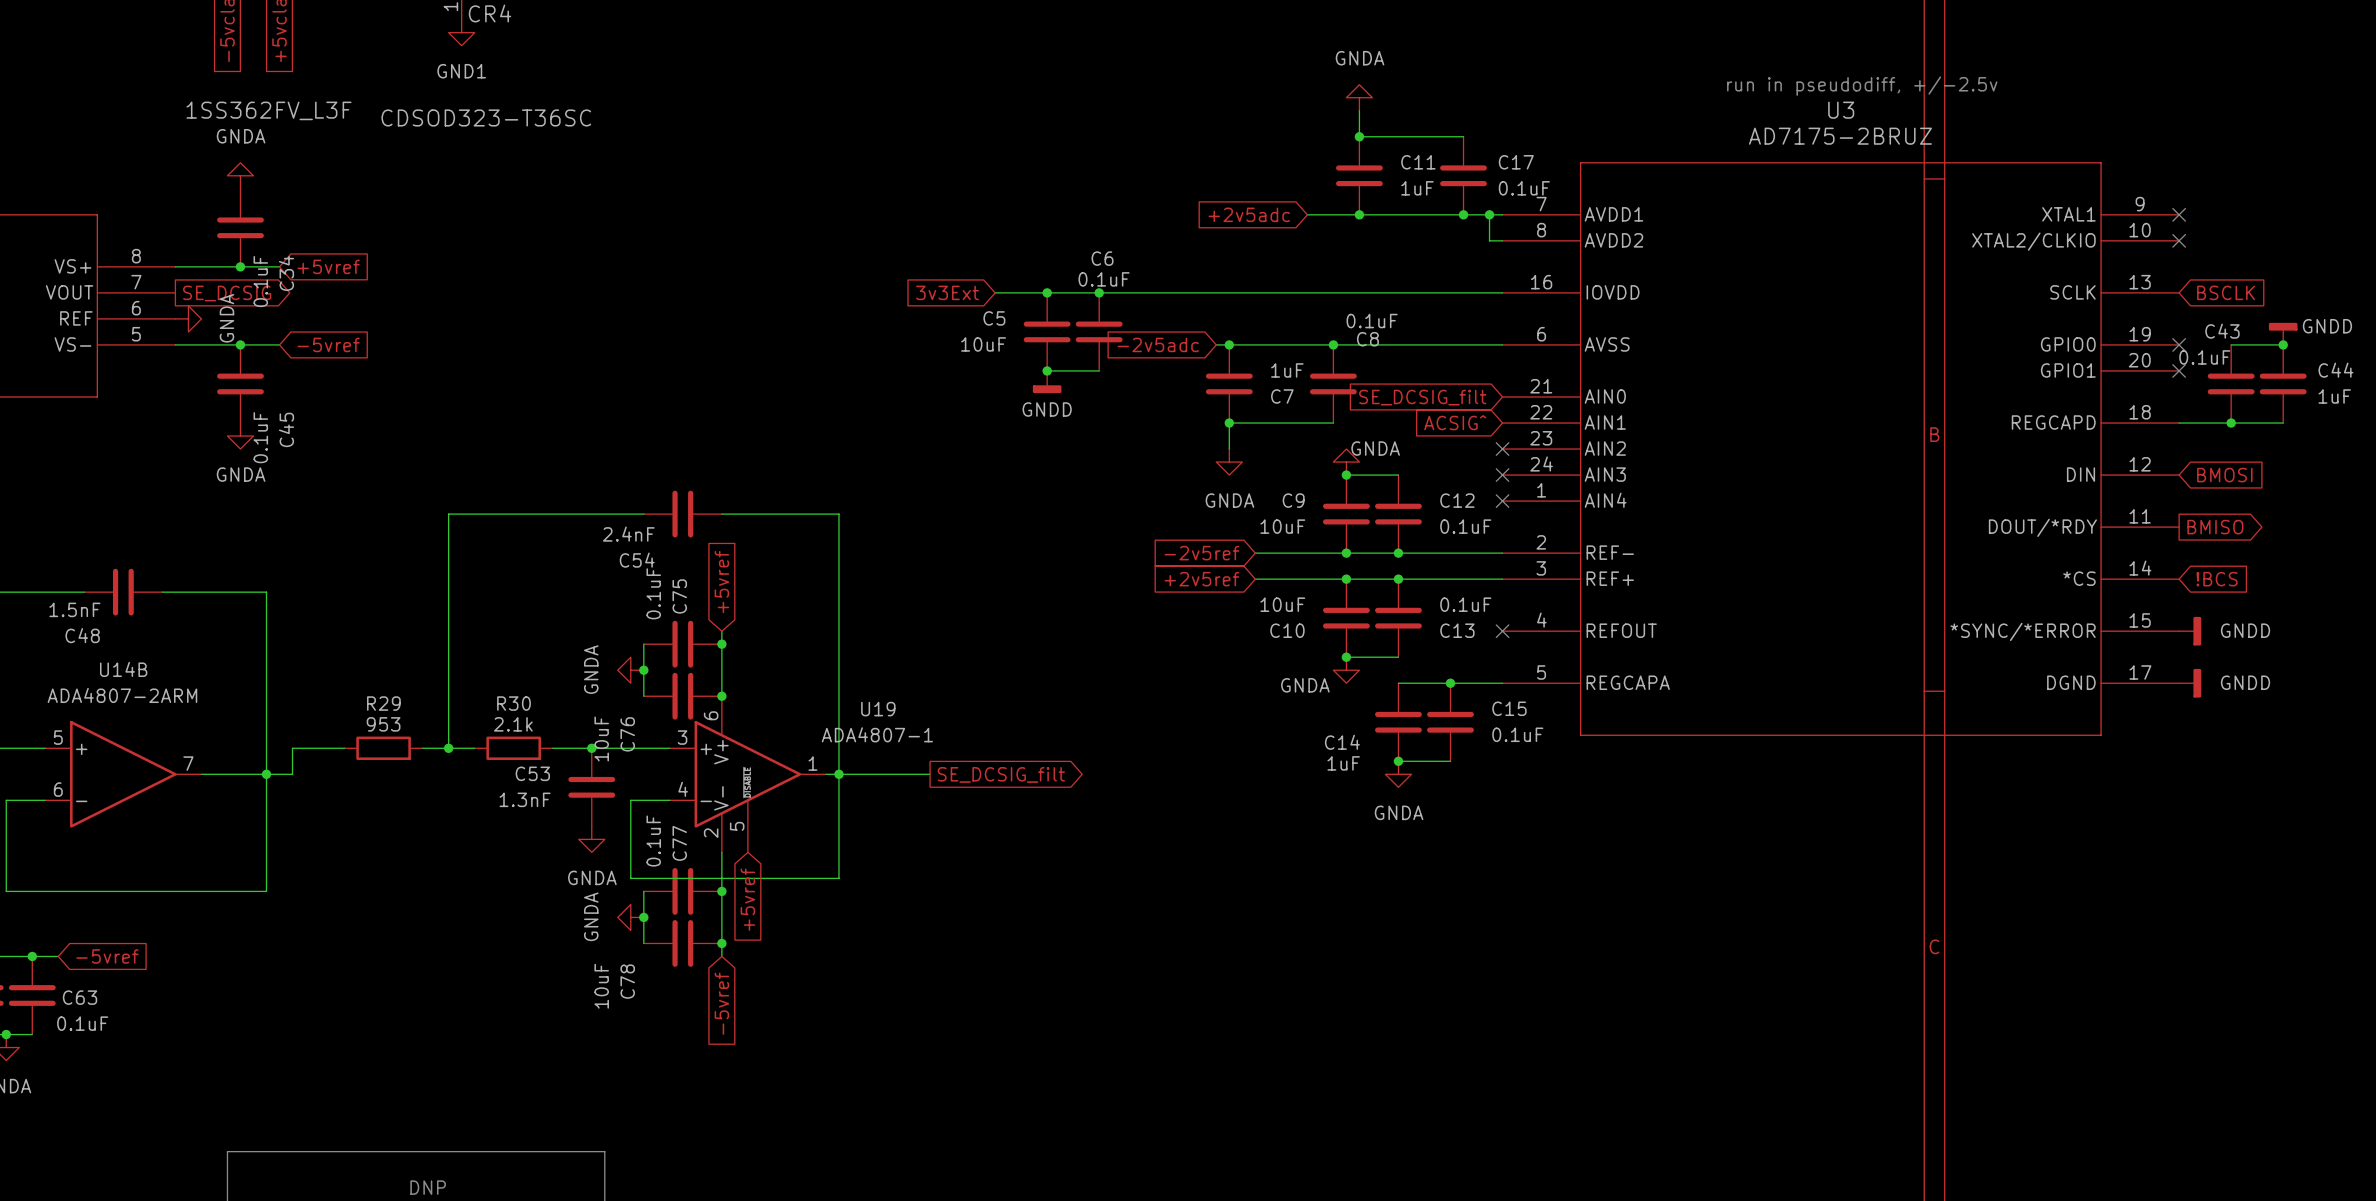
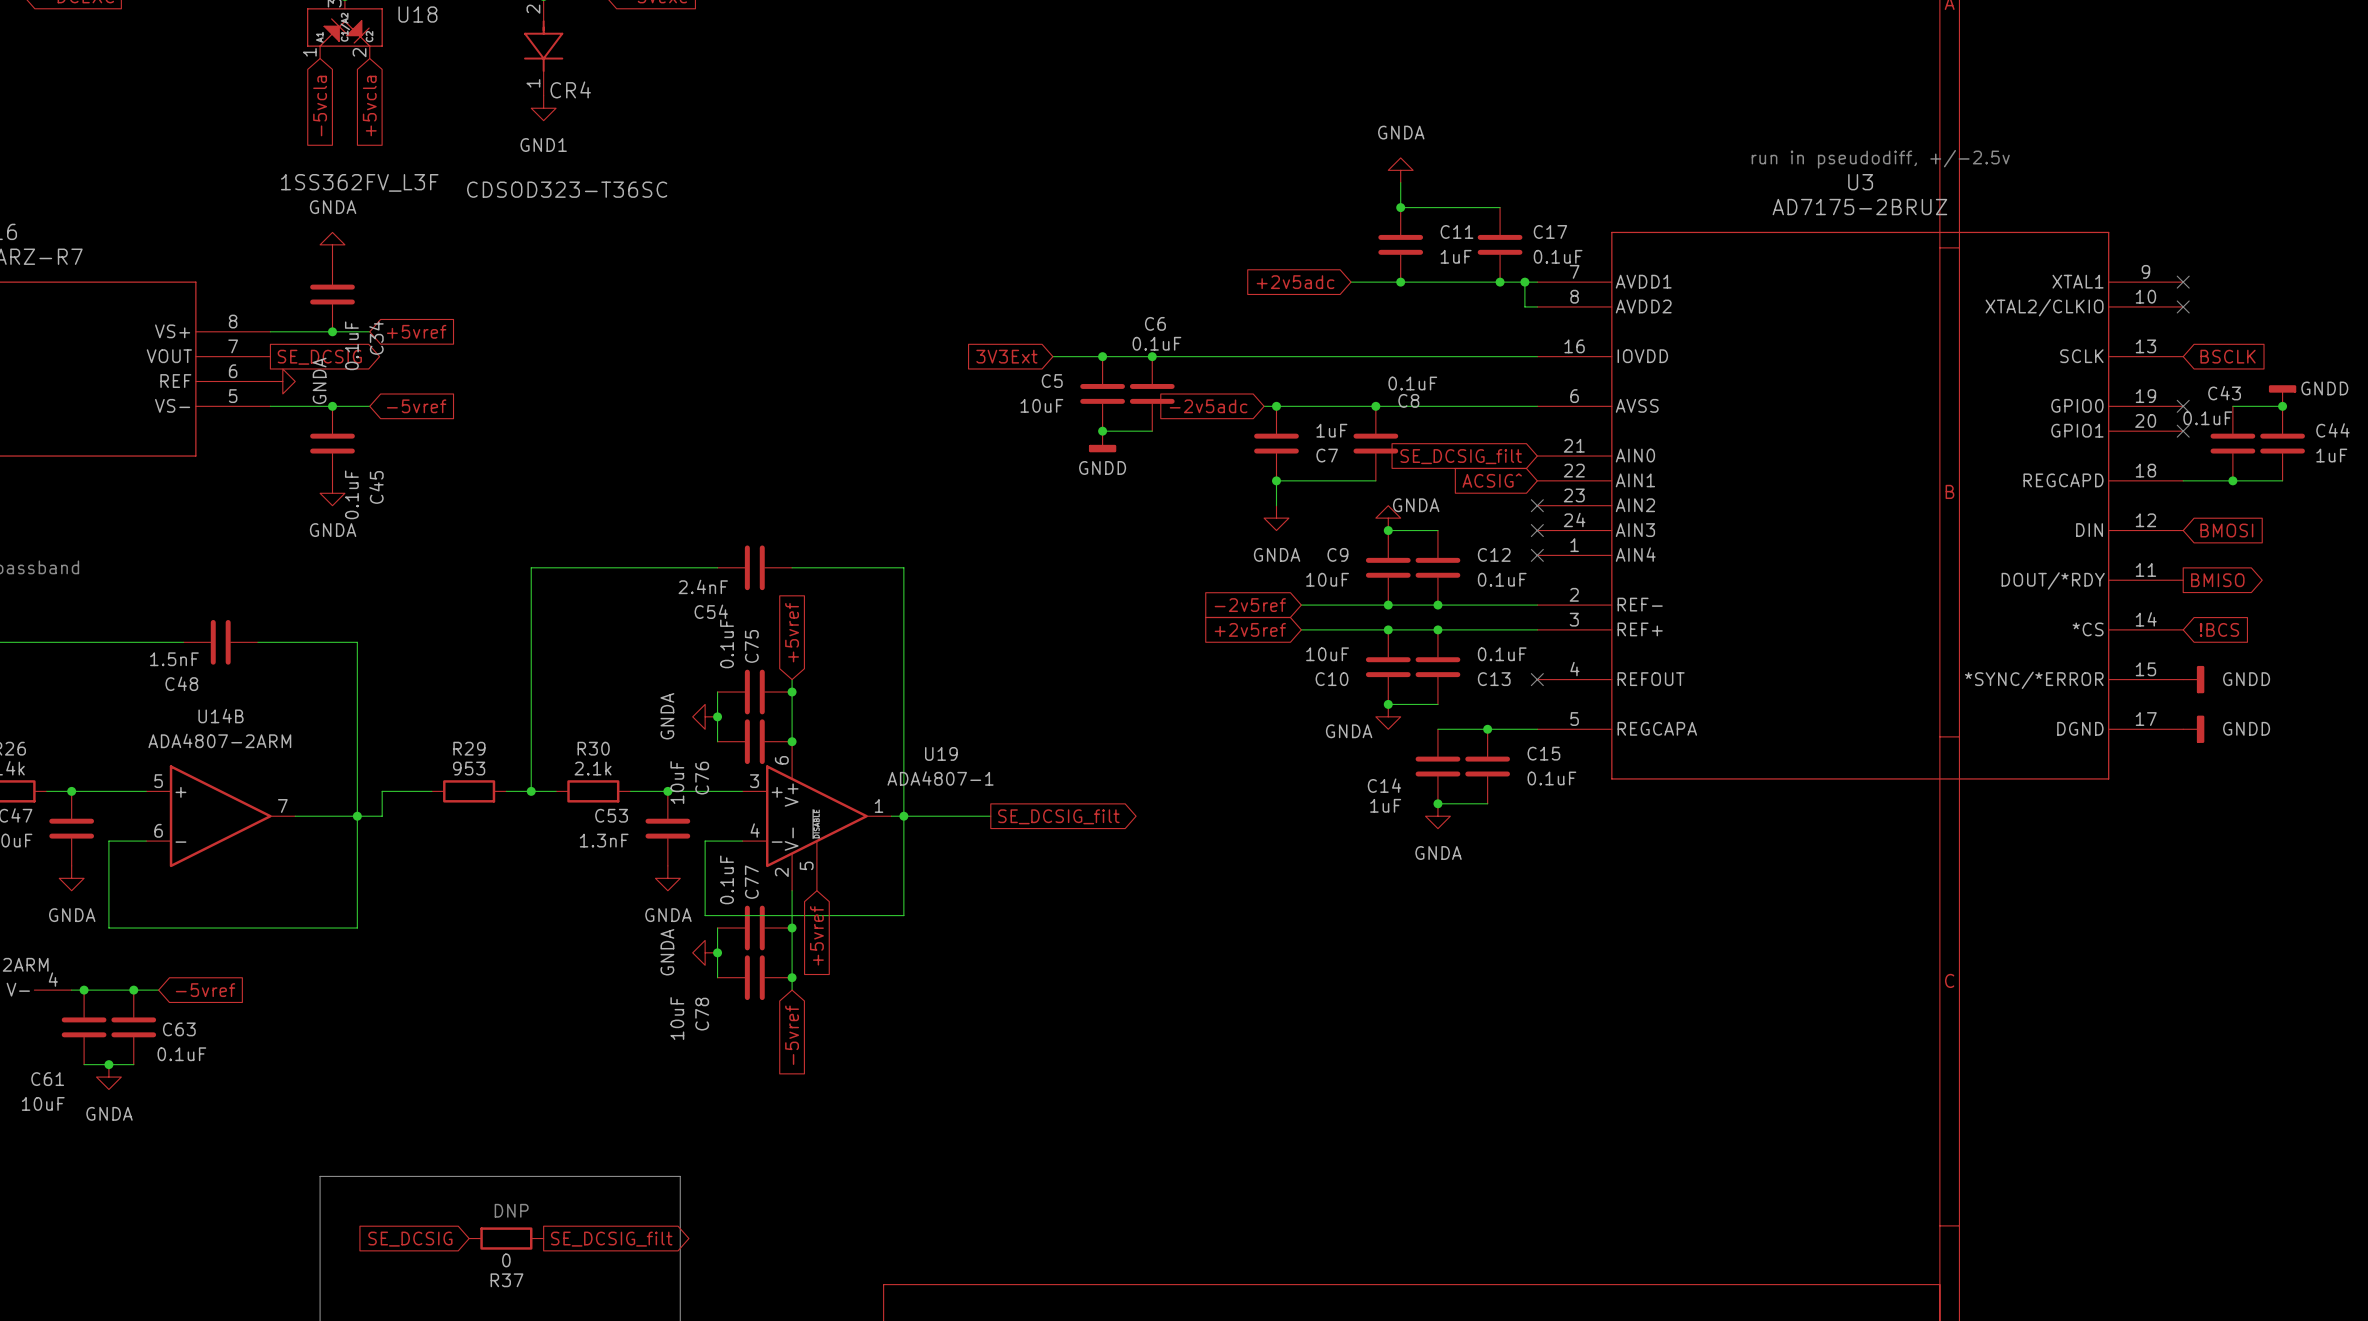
global label: 3v3Ext (947, 292) -> 3V3Ext (1006, 356)

